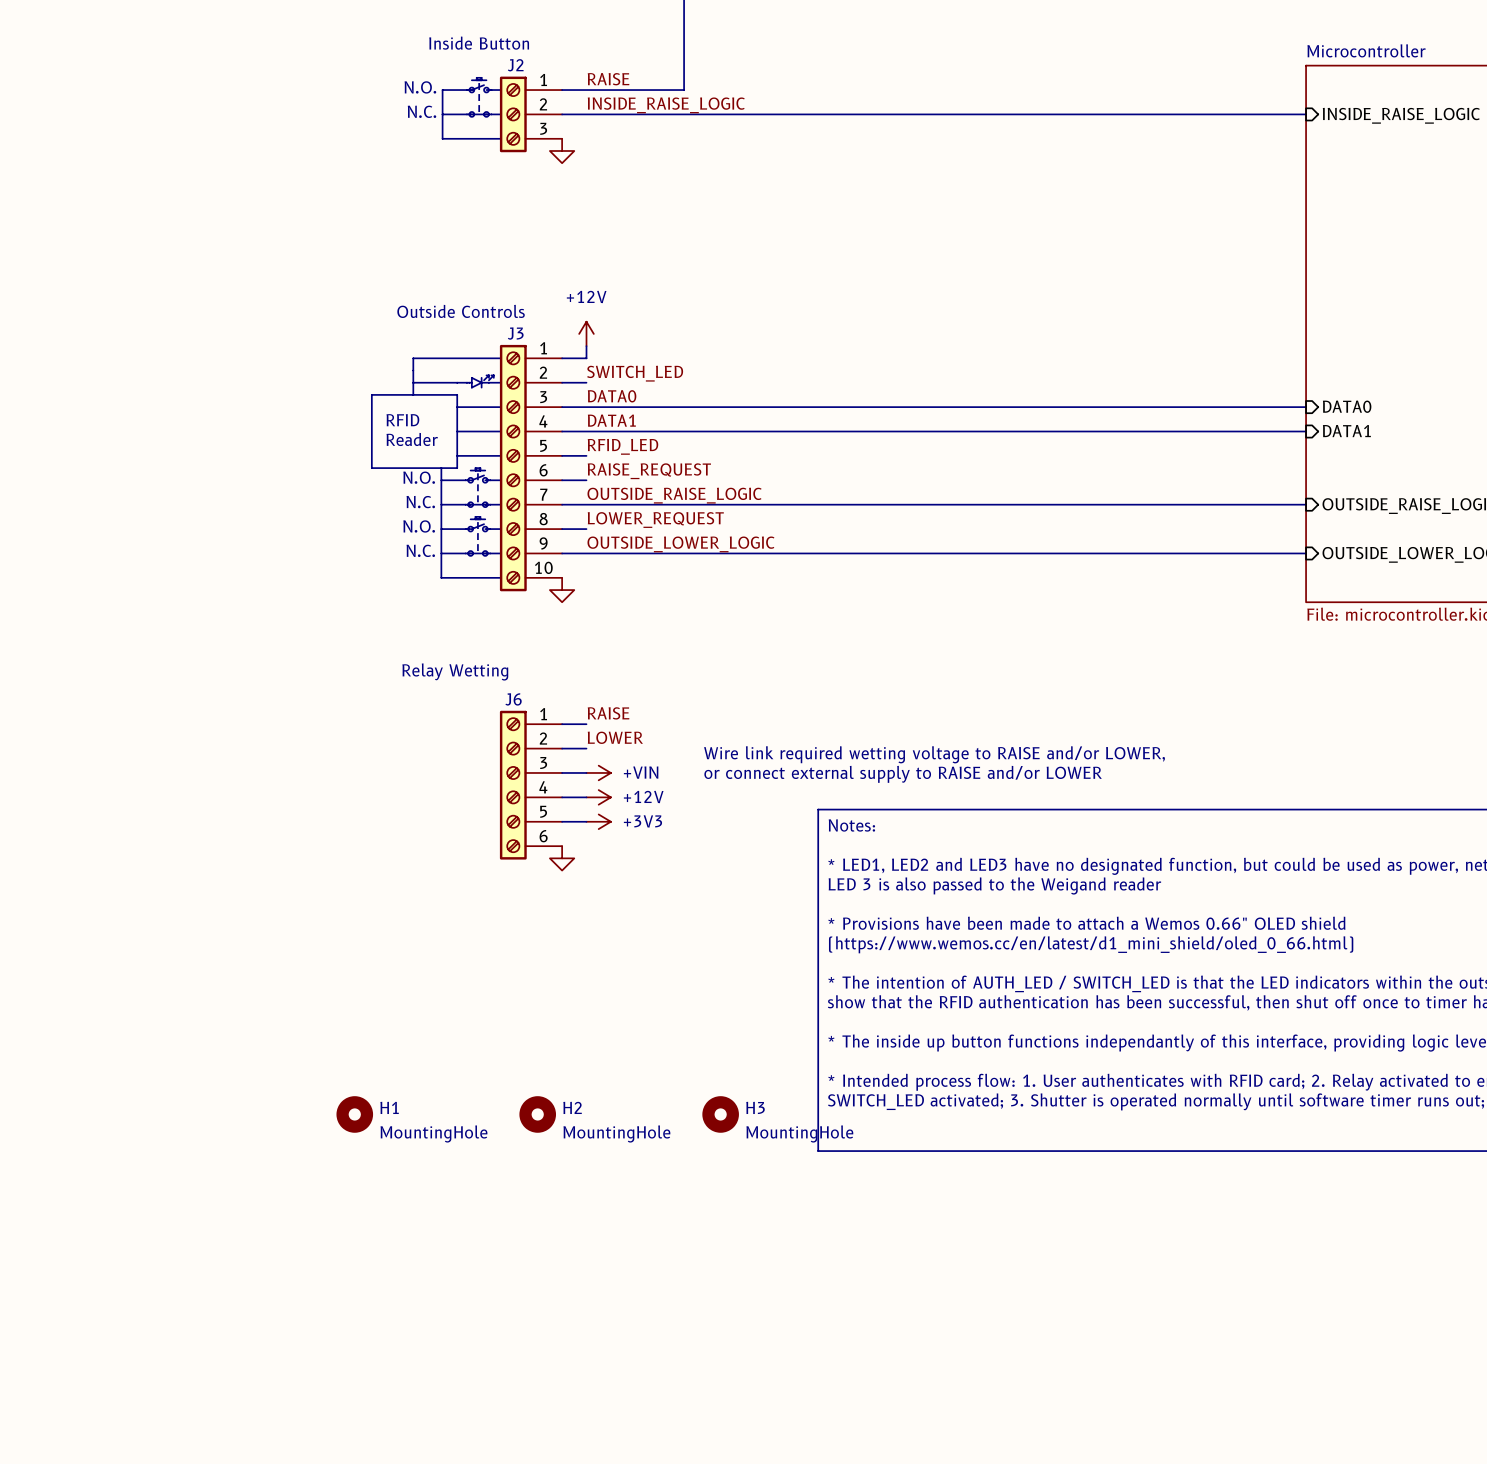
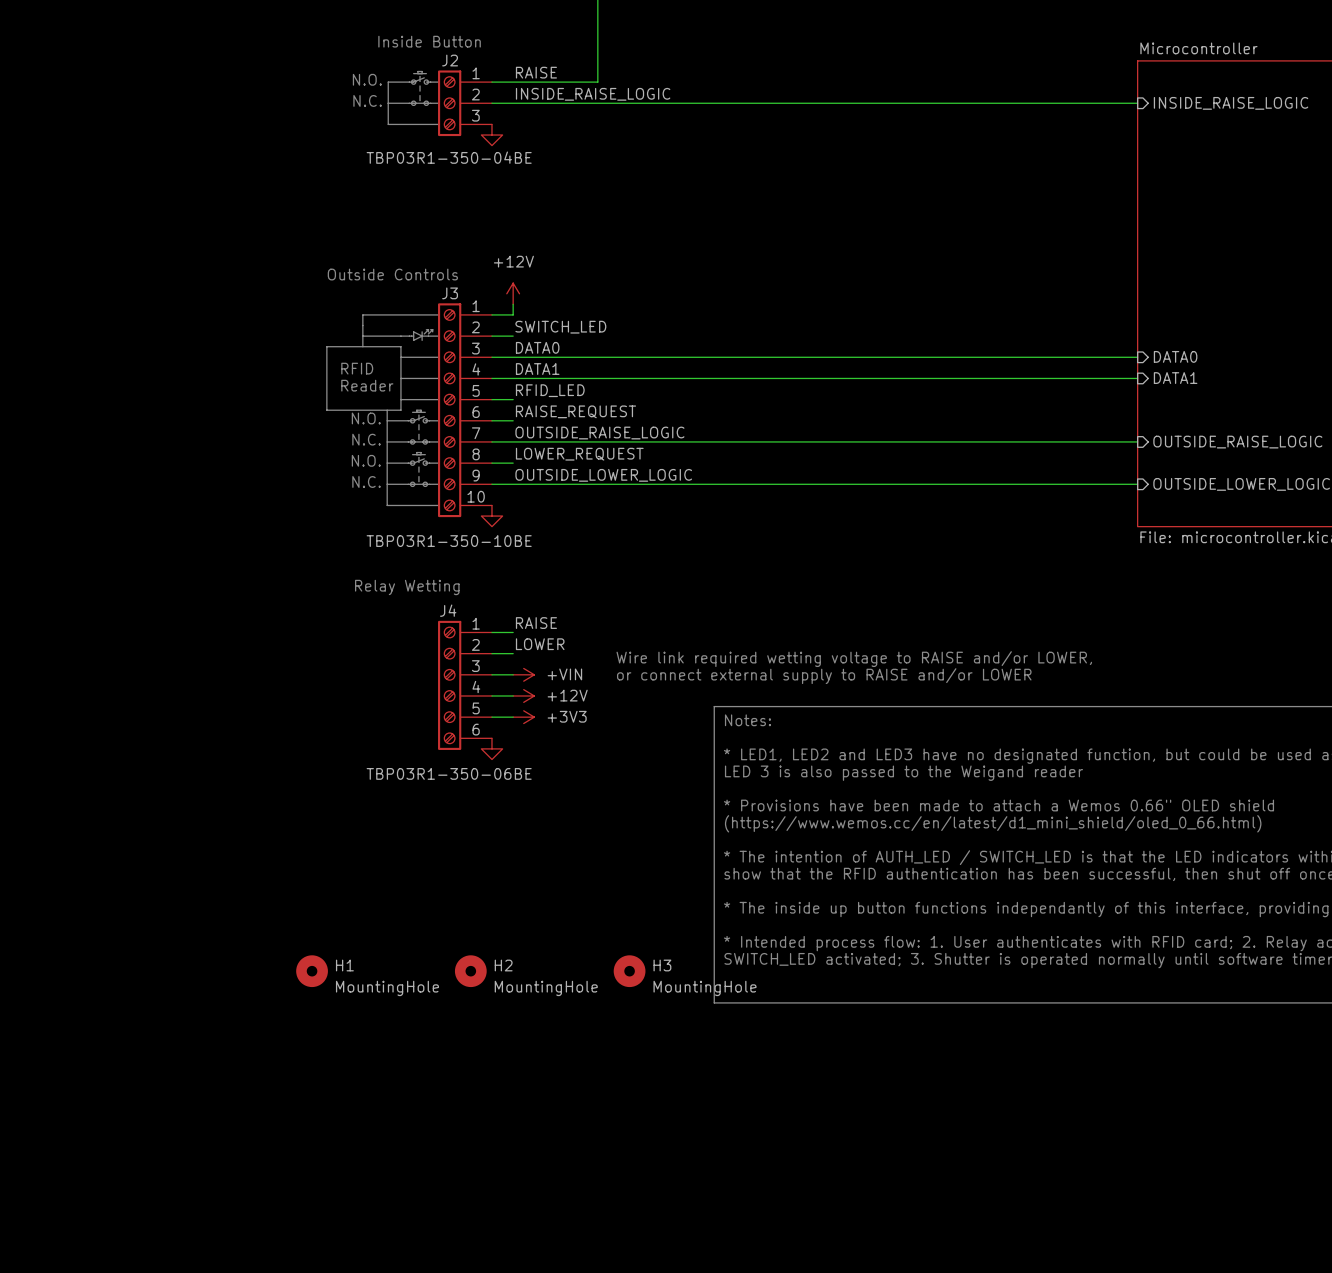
J2 text: none -> TBP03R1-350-04BE (449, 157)
J3 text: none -> TBP03R1-350-10BE (449, 541)
J6 name: J6 (513, 699) -> J4 (448, 610)
J6 text: none -> TBP03R1-350-06BE (449, 773)

